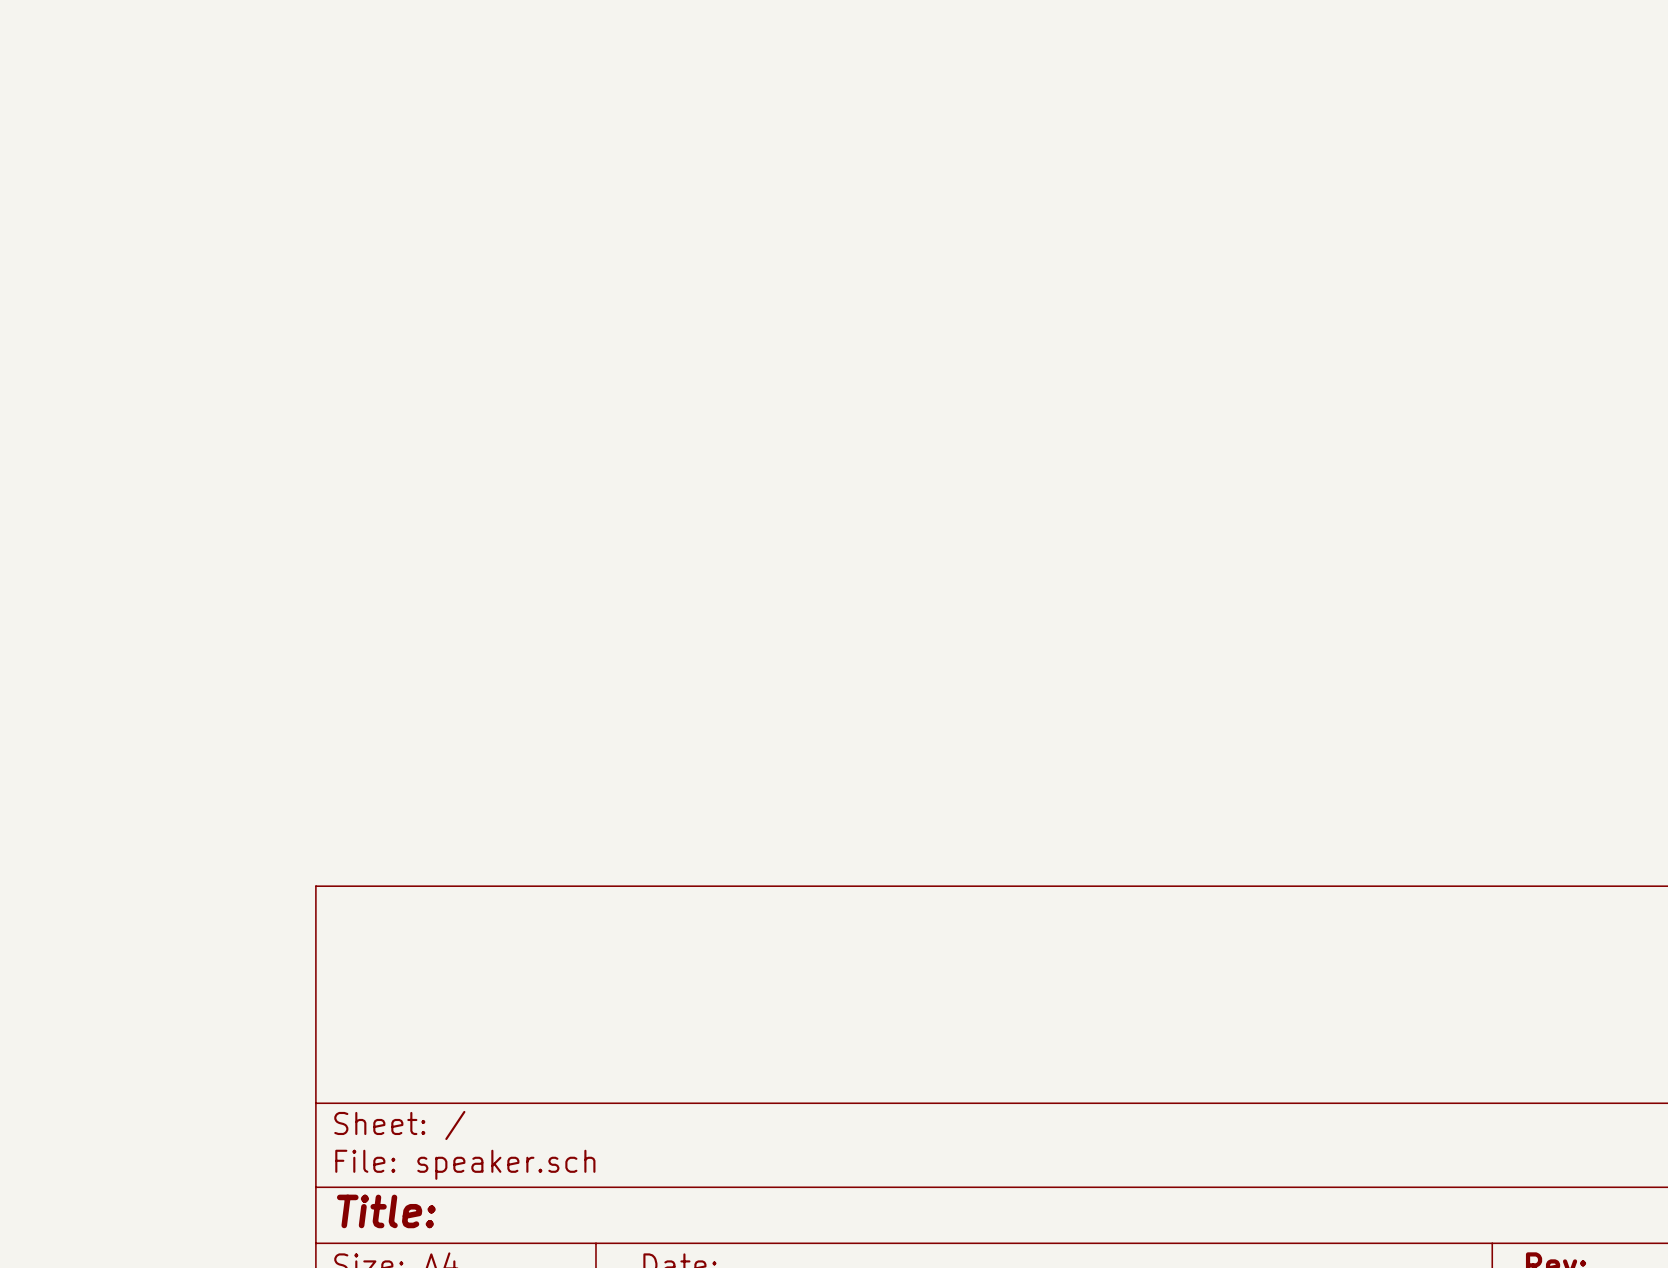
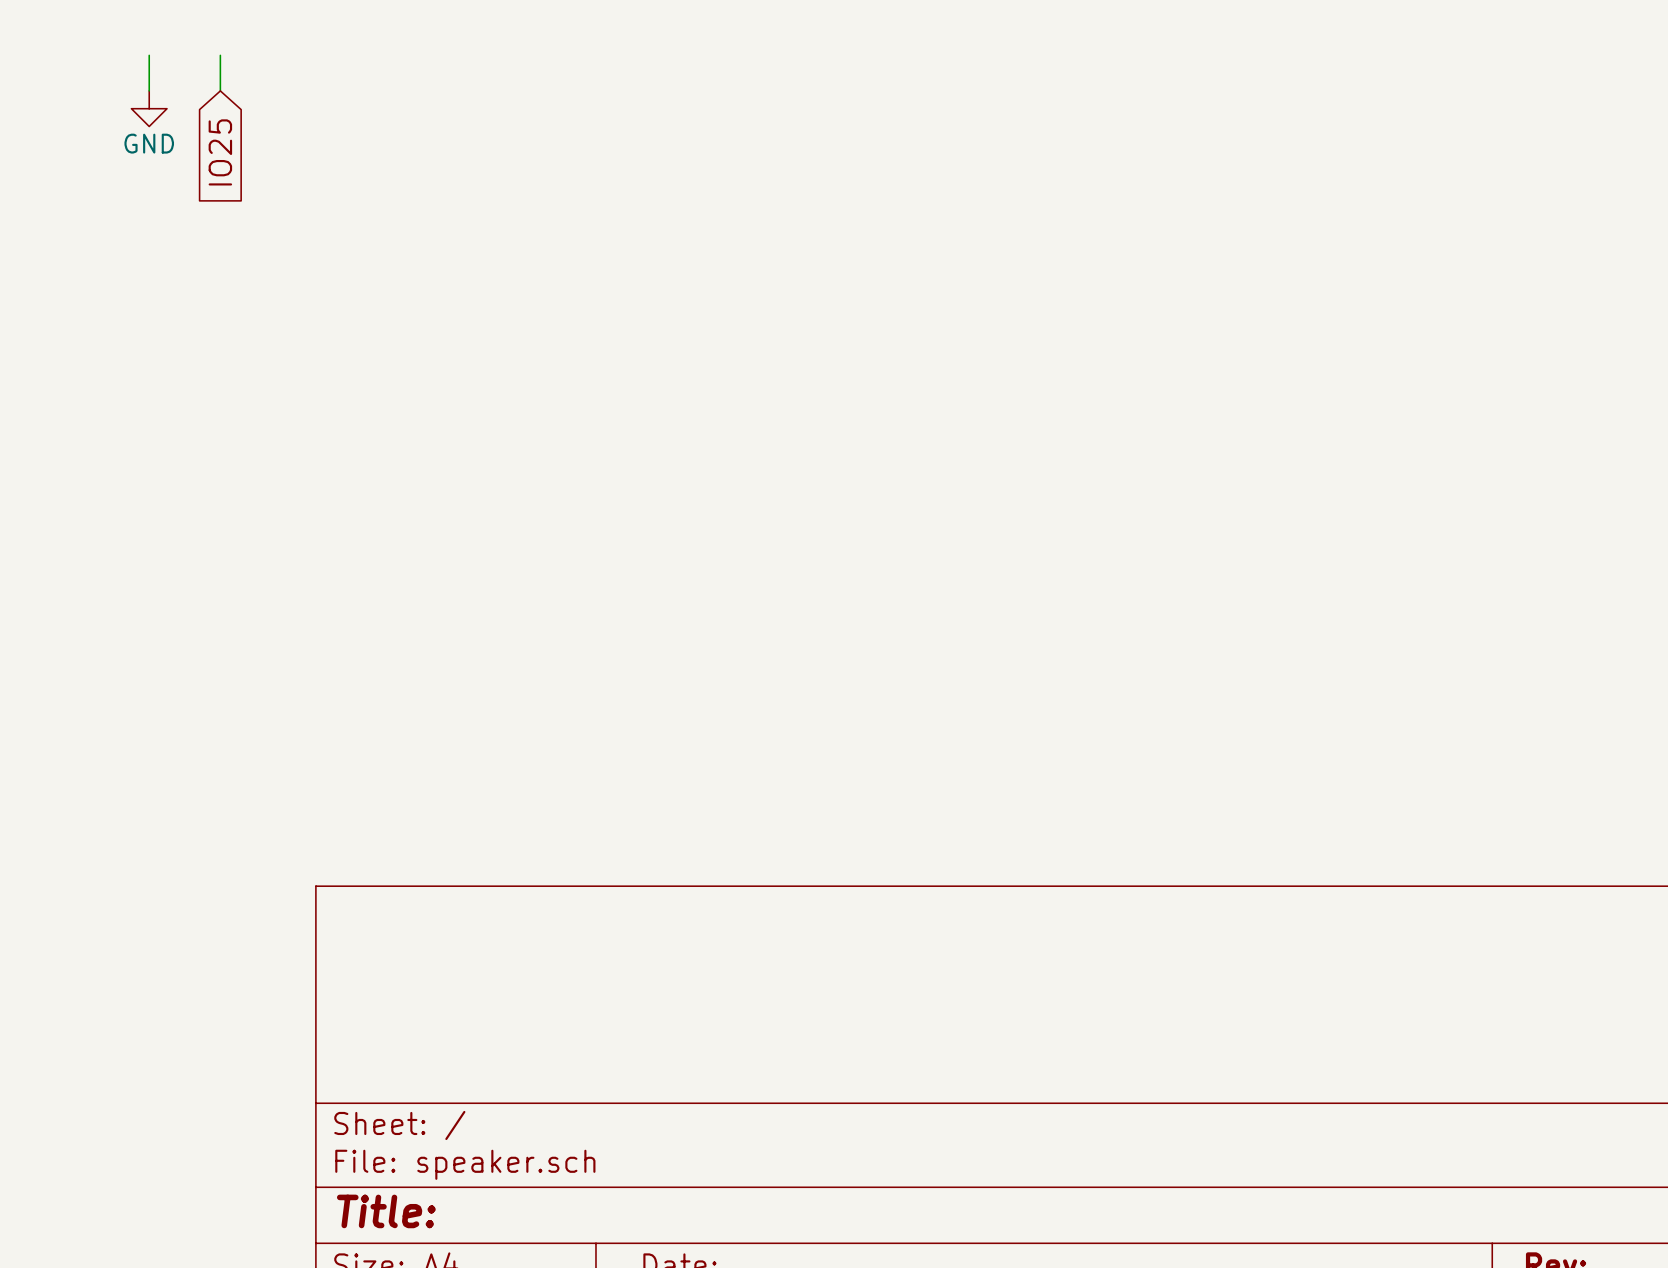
wire: none -> (149, 55) (149, 90)
wire: none -> (220, 55) (220, 90)
power symbol: none -> GND (149, 108)
global label: none -> IO25 (220, 152)

